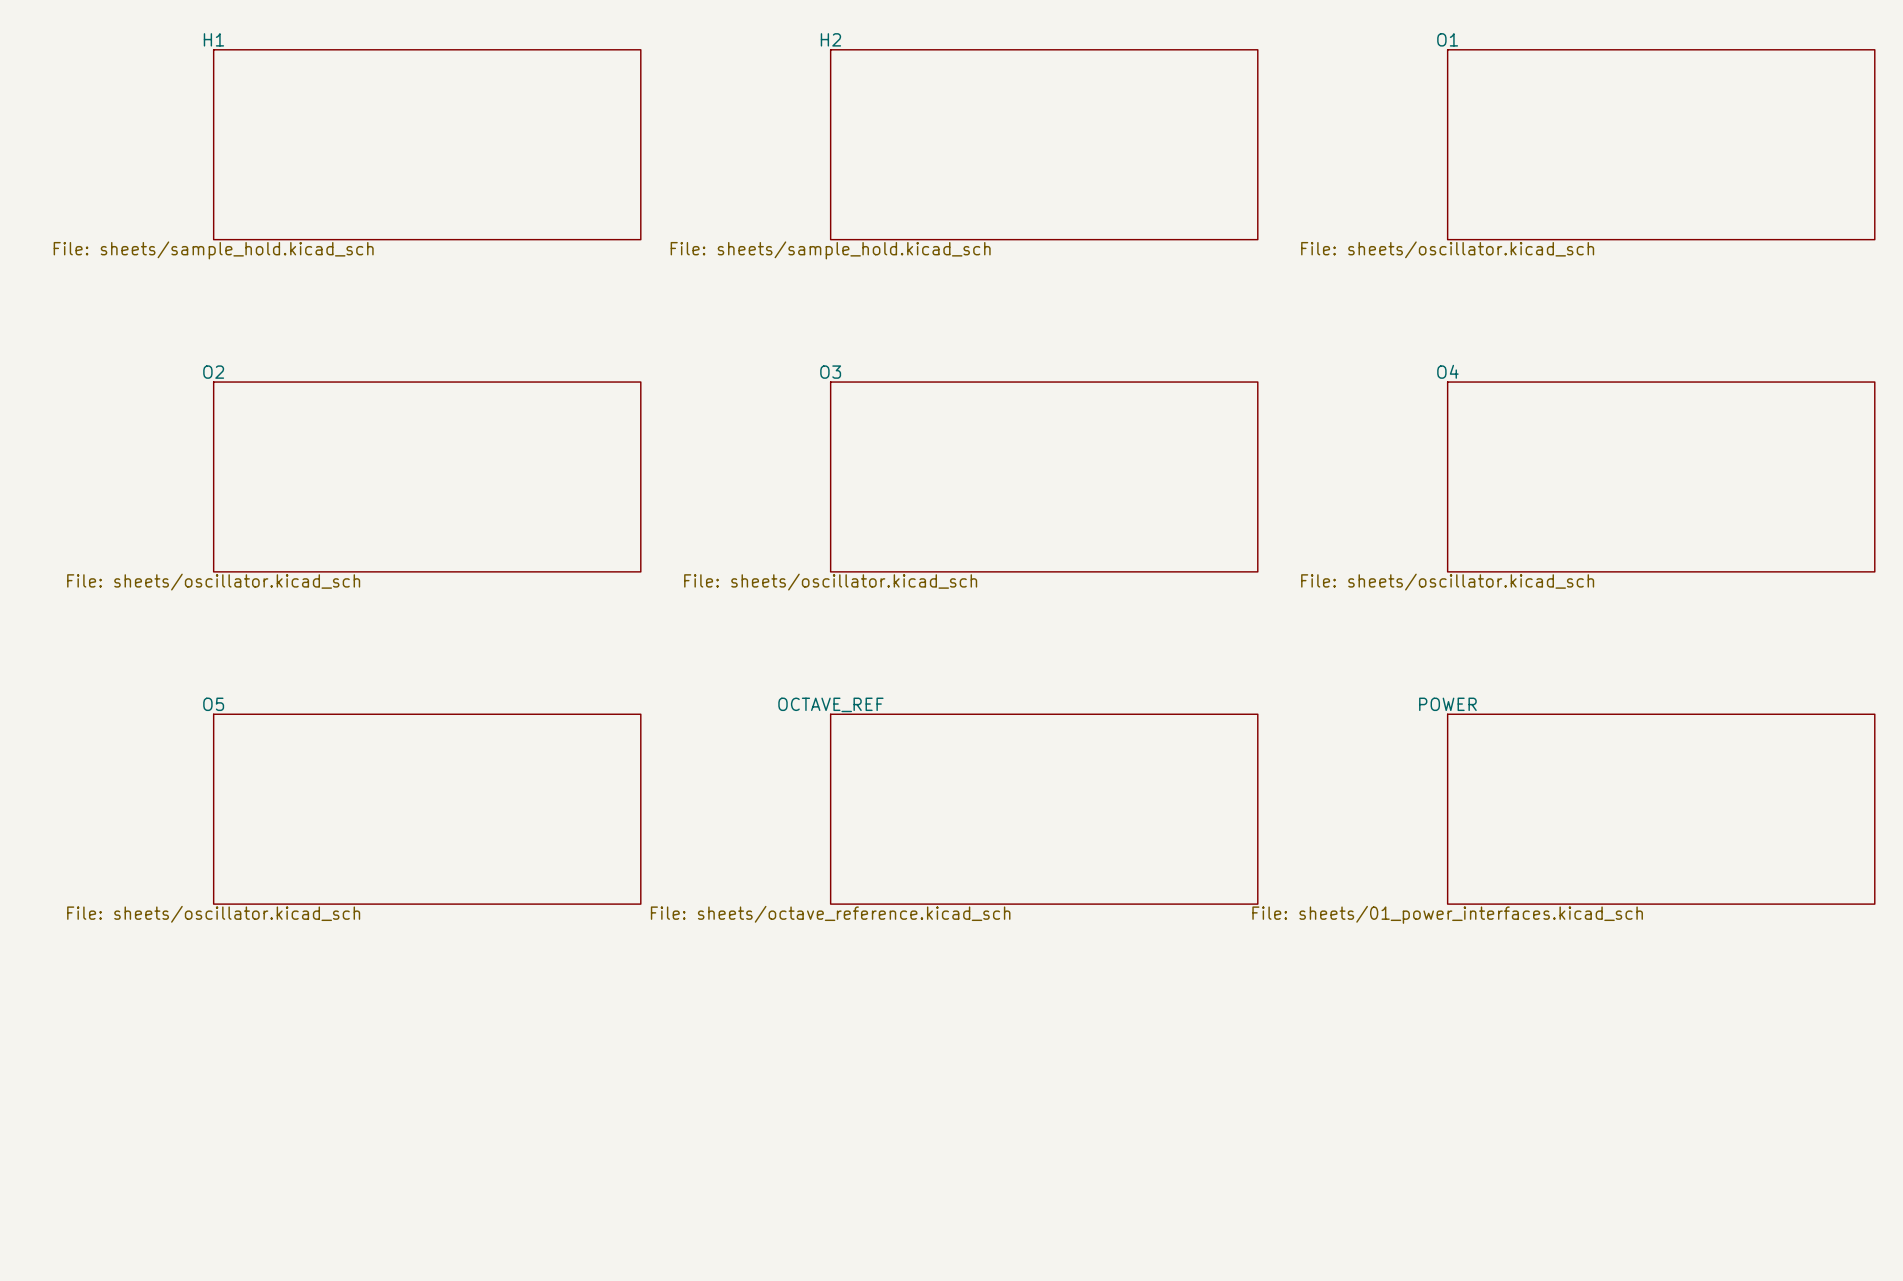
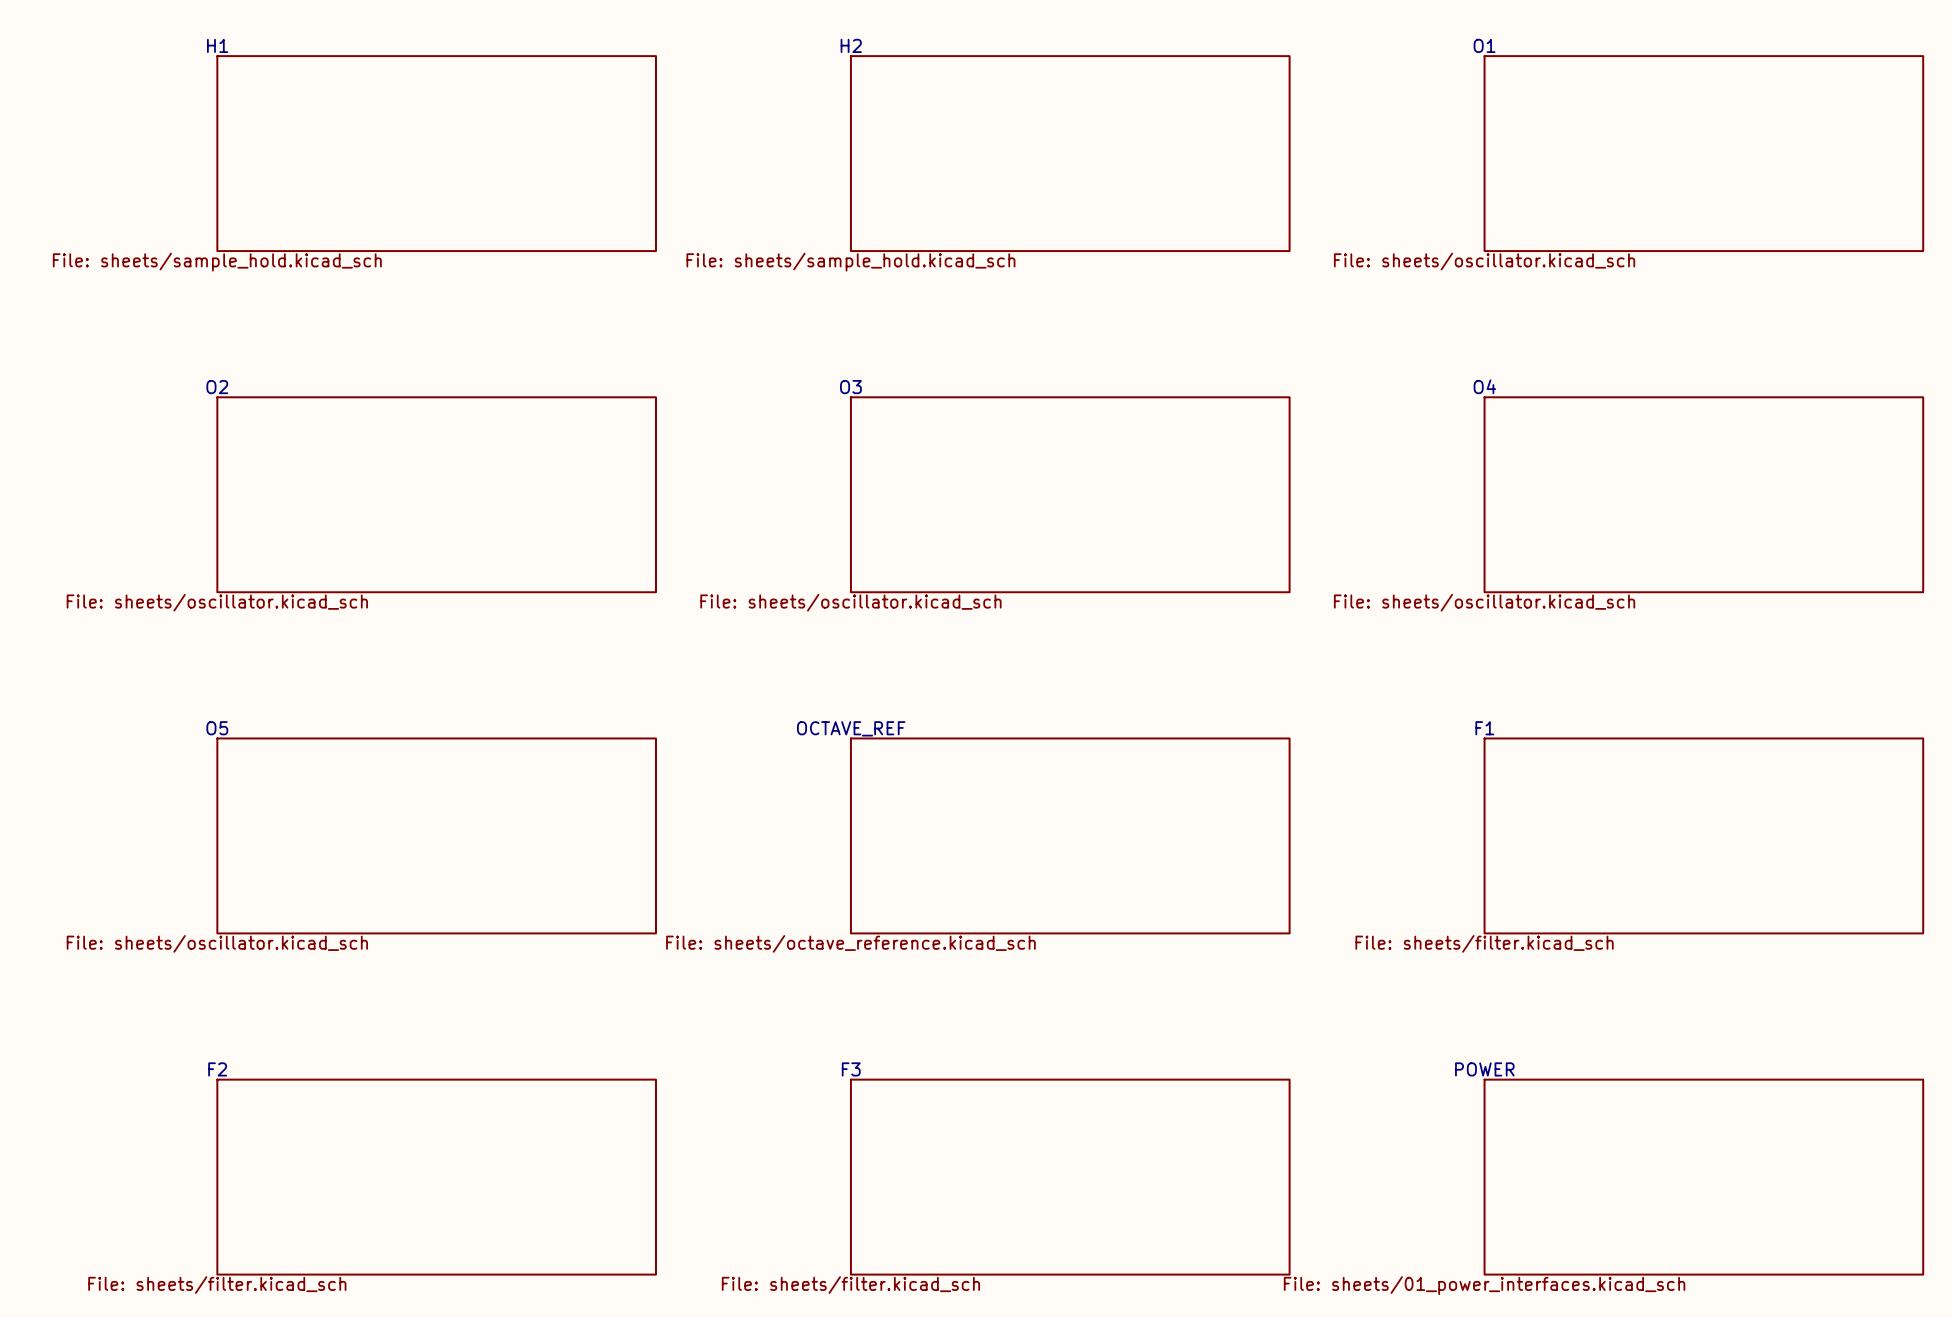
sheet POWER name: POWER (1447, 704) -> F1 (1484, 728)
sheet POWER value: File: sheets/01_power_interfaces.kicad_sch (1447, 914) -> File: sheets/filter.kicad_sch (1484, 943)
sheet F2: none -> File: sheets/filter.kicad_sch (436, 1177)
sheet F3: none -> File: sheets/filter.kicad_sch (1070, 1177)
sheet POWER: none -> File: sheets/01_power_interfaces.kicad_sch (1703, 1177)

